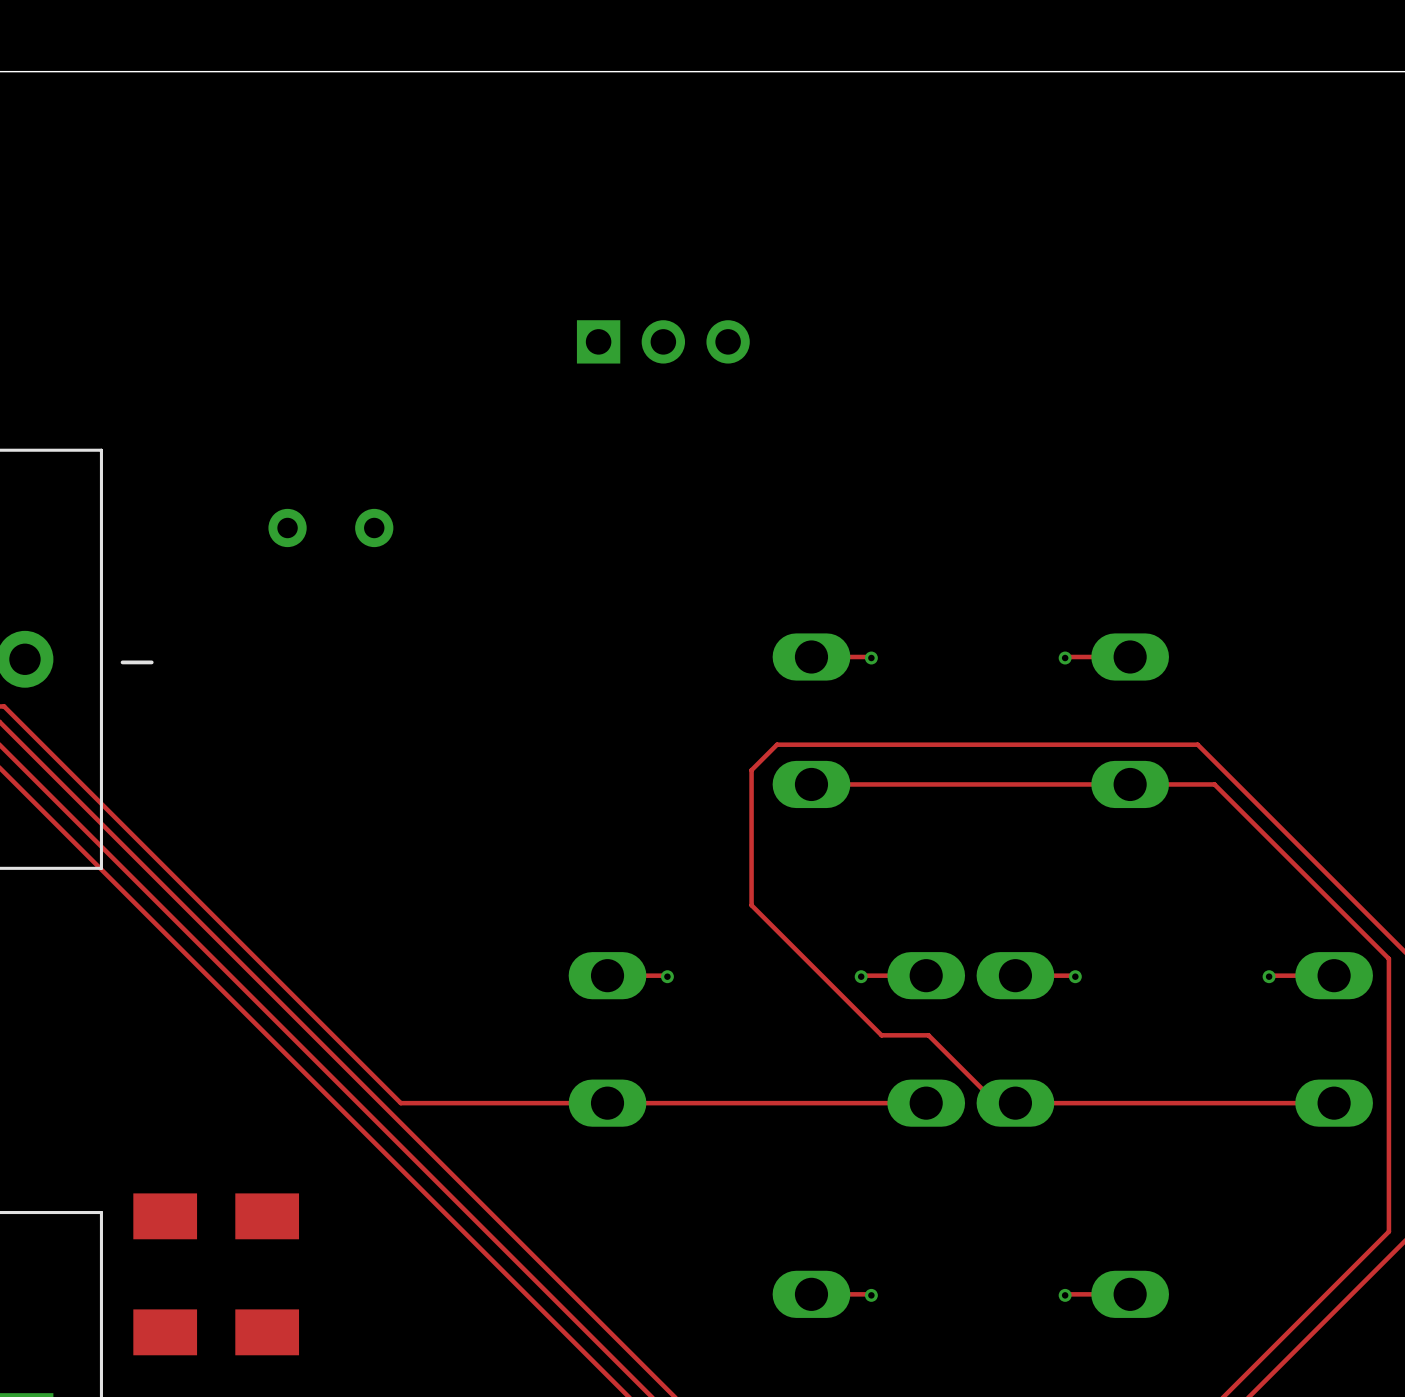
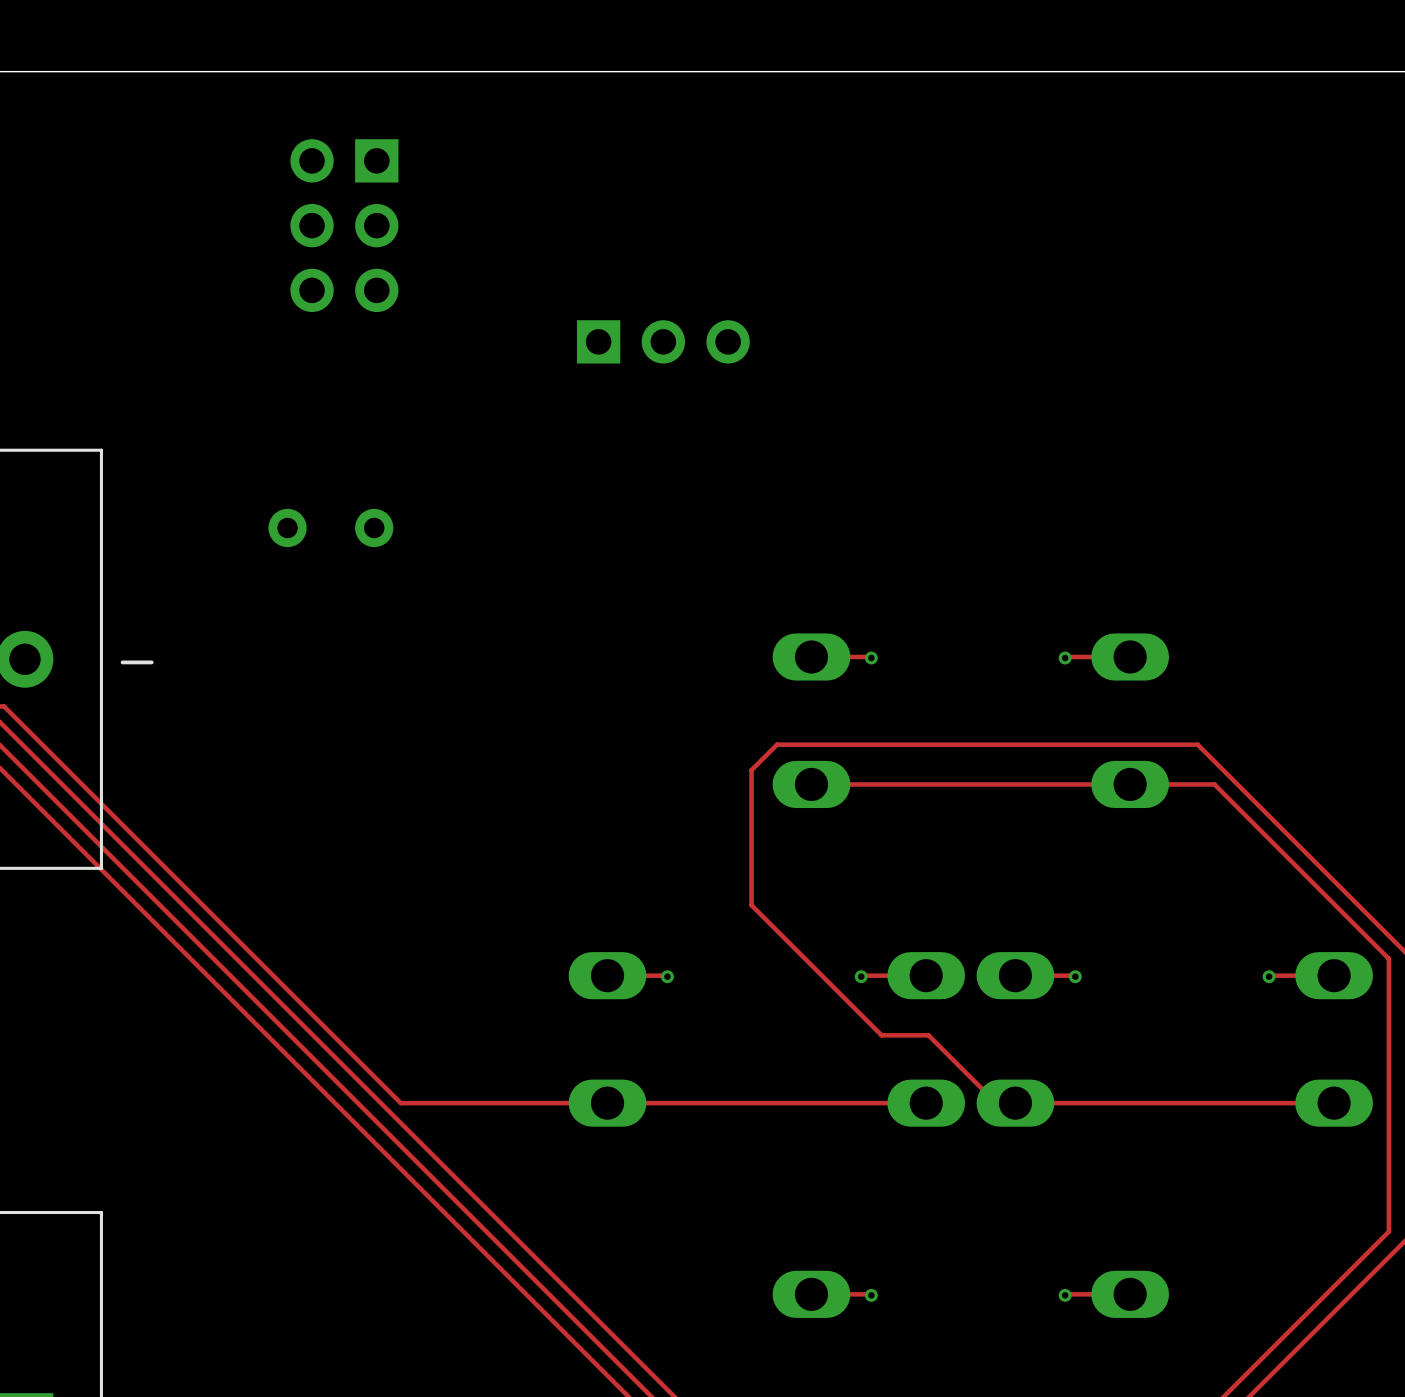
part: none -> (344, 225)
part: (216, 1216) -> none
part: (216, 1332) -> none

